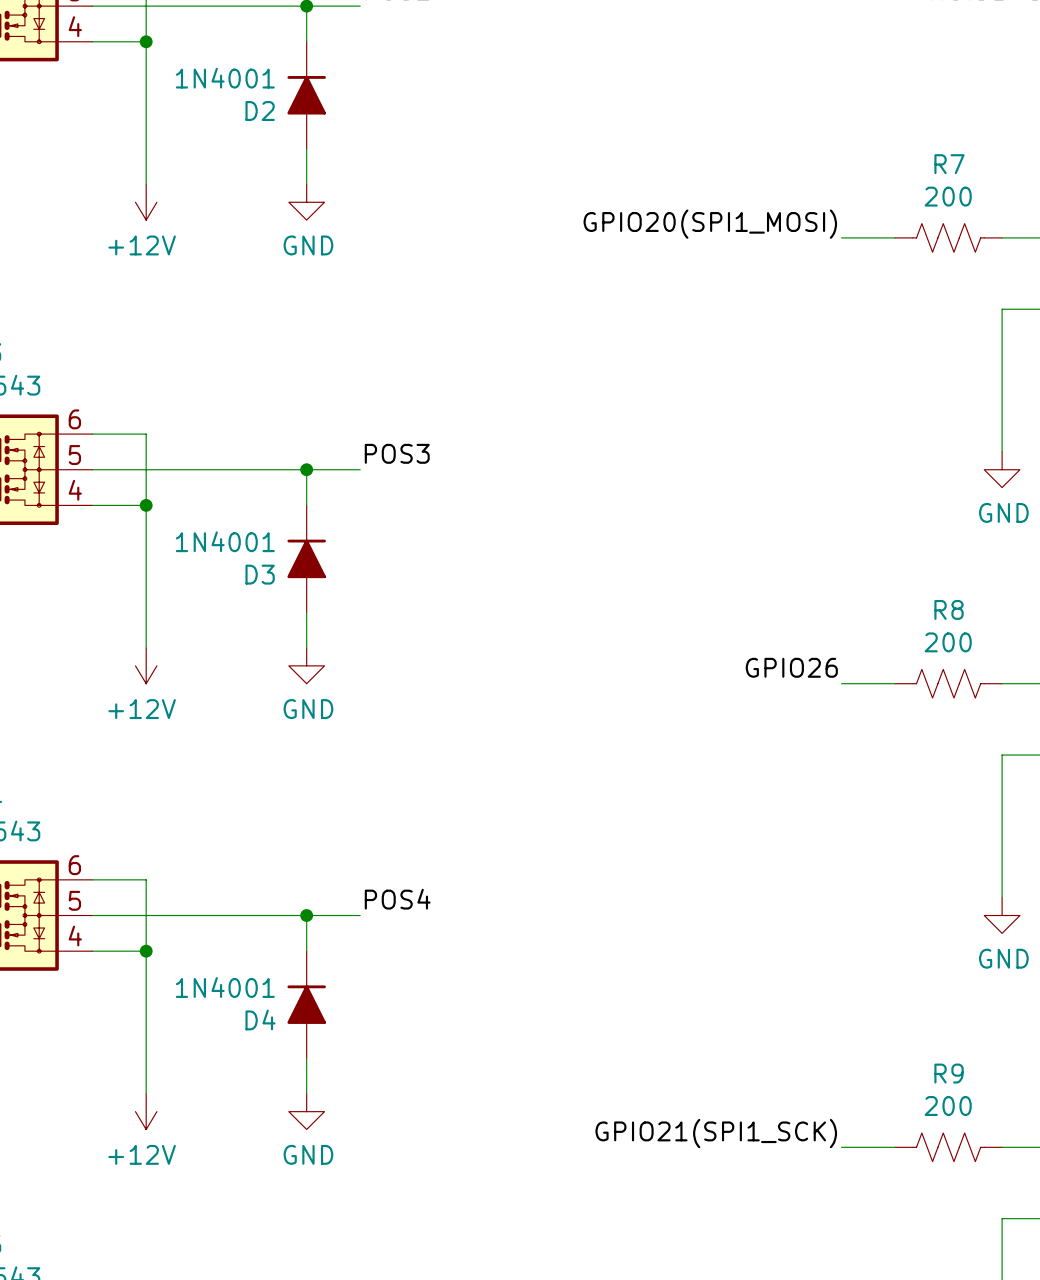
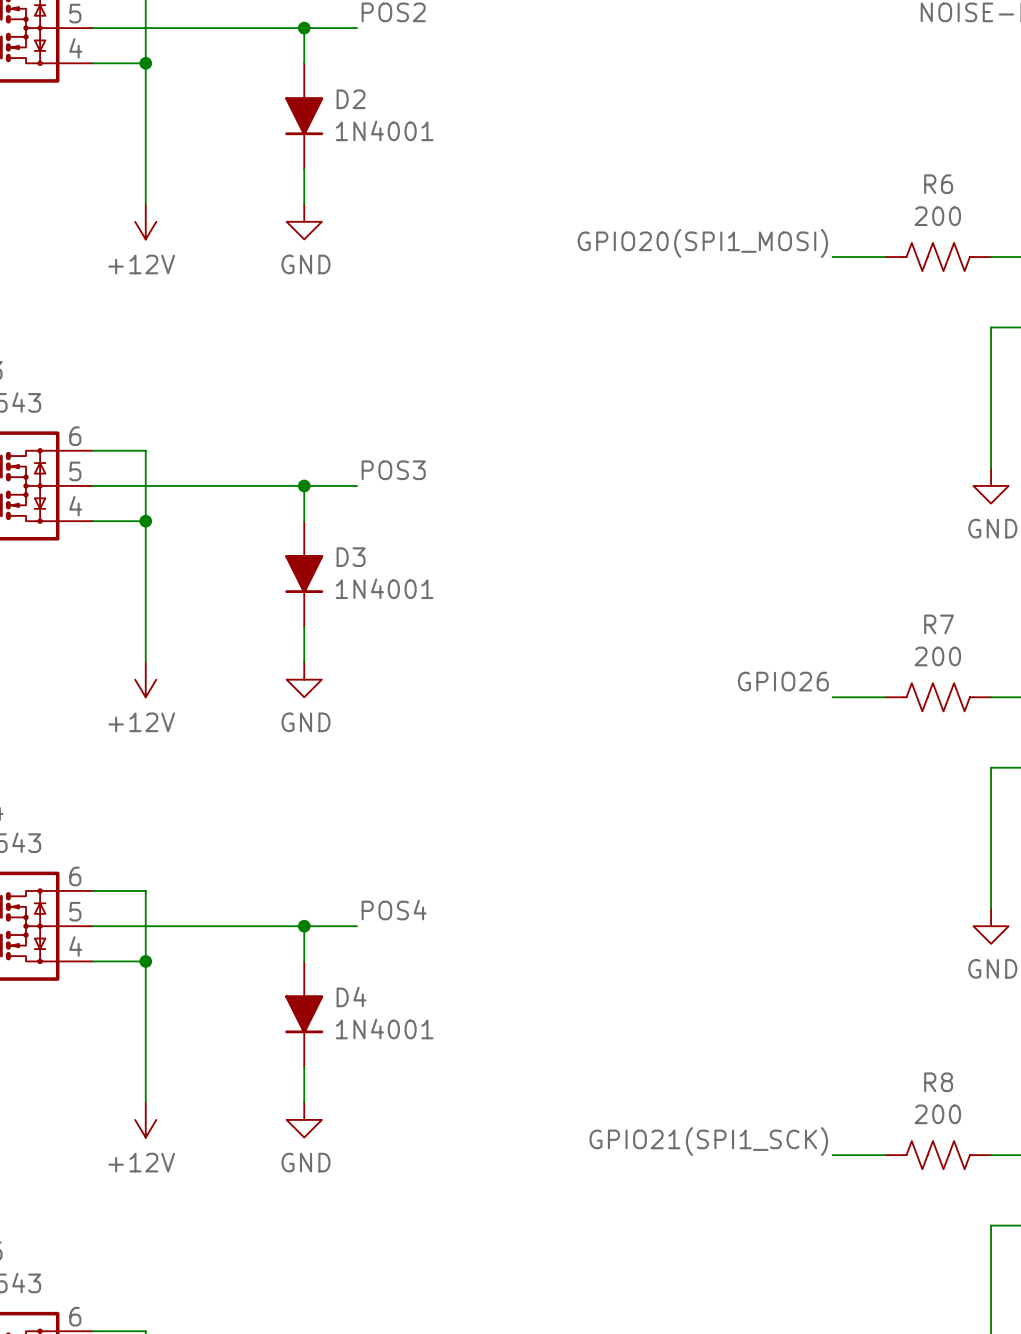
D2 rotation: 0° (306, 95) -> 180° (304, 116)
R7 name: R7 (949, 164) -> R6 (938, 184)
D3 rotation: 0° (306, 558) -> 180° (304, 574)
R8 name: R8 (949, 609) -> R7 (939, 624)
D4 rotation: 0° (306, 1004) -> 180° (304, 1014)
R9 name: R9 (949, 1073) -> R8 (938, 1082)

